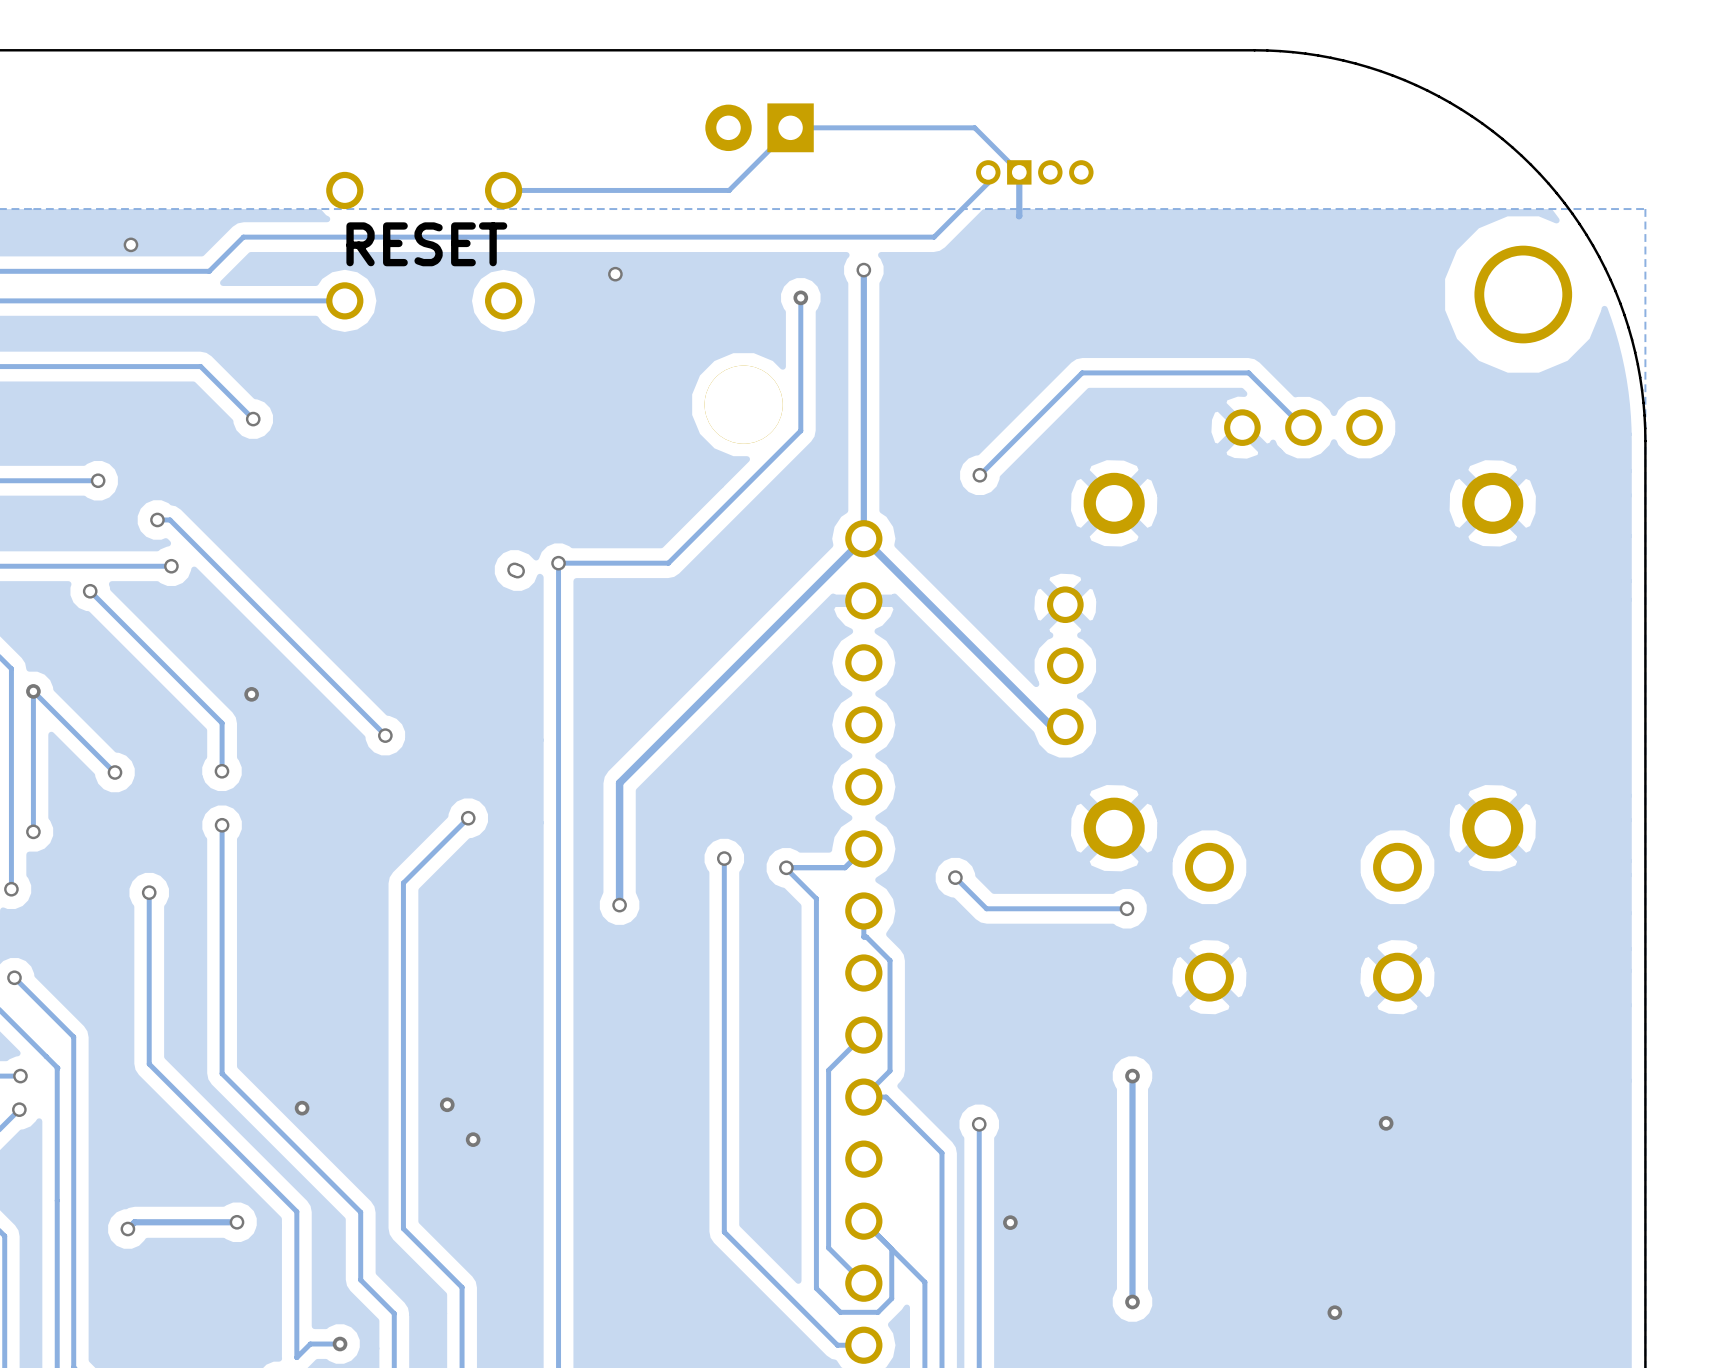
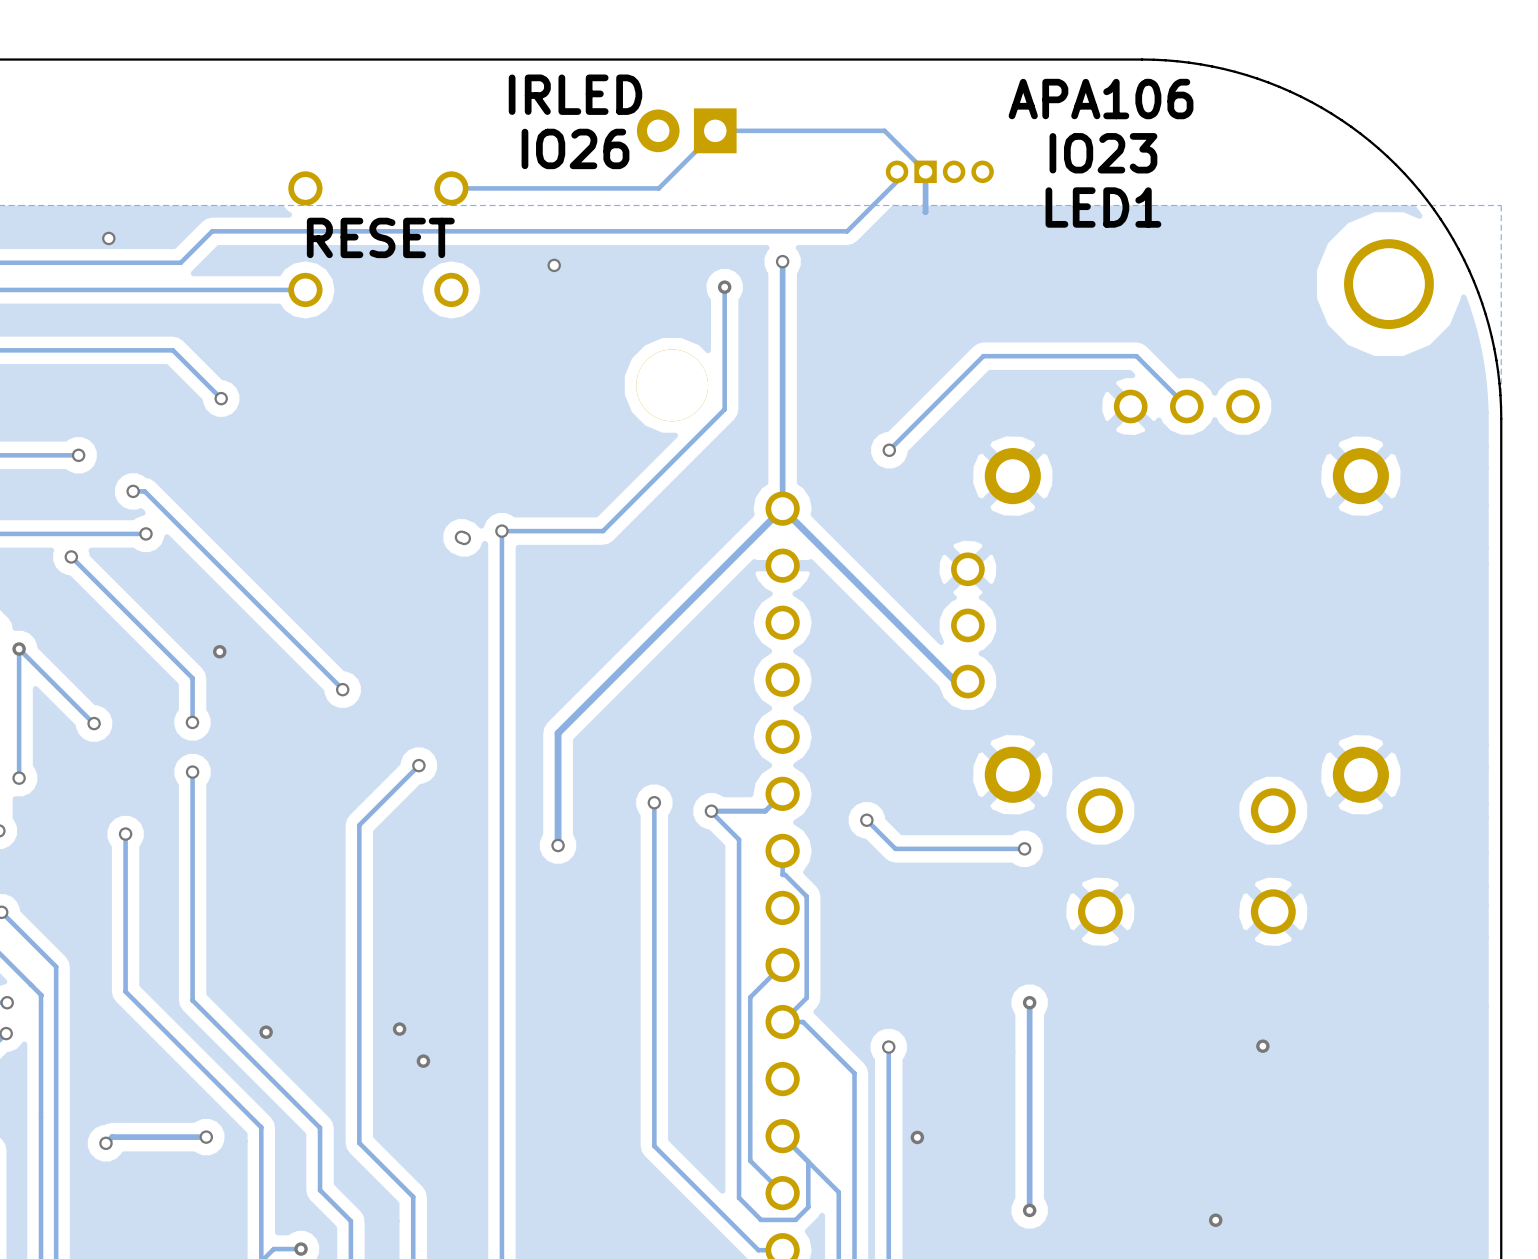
text: none -> IRLED (575, 94)
text: none -> APA106 (1101, 99)
text: none -> IO26 (575, 148)
text: none -> IO23 (1103, 153)
text: none -> LED1 (1103, 207)

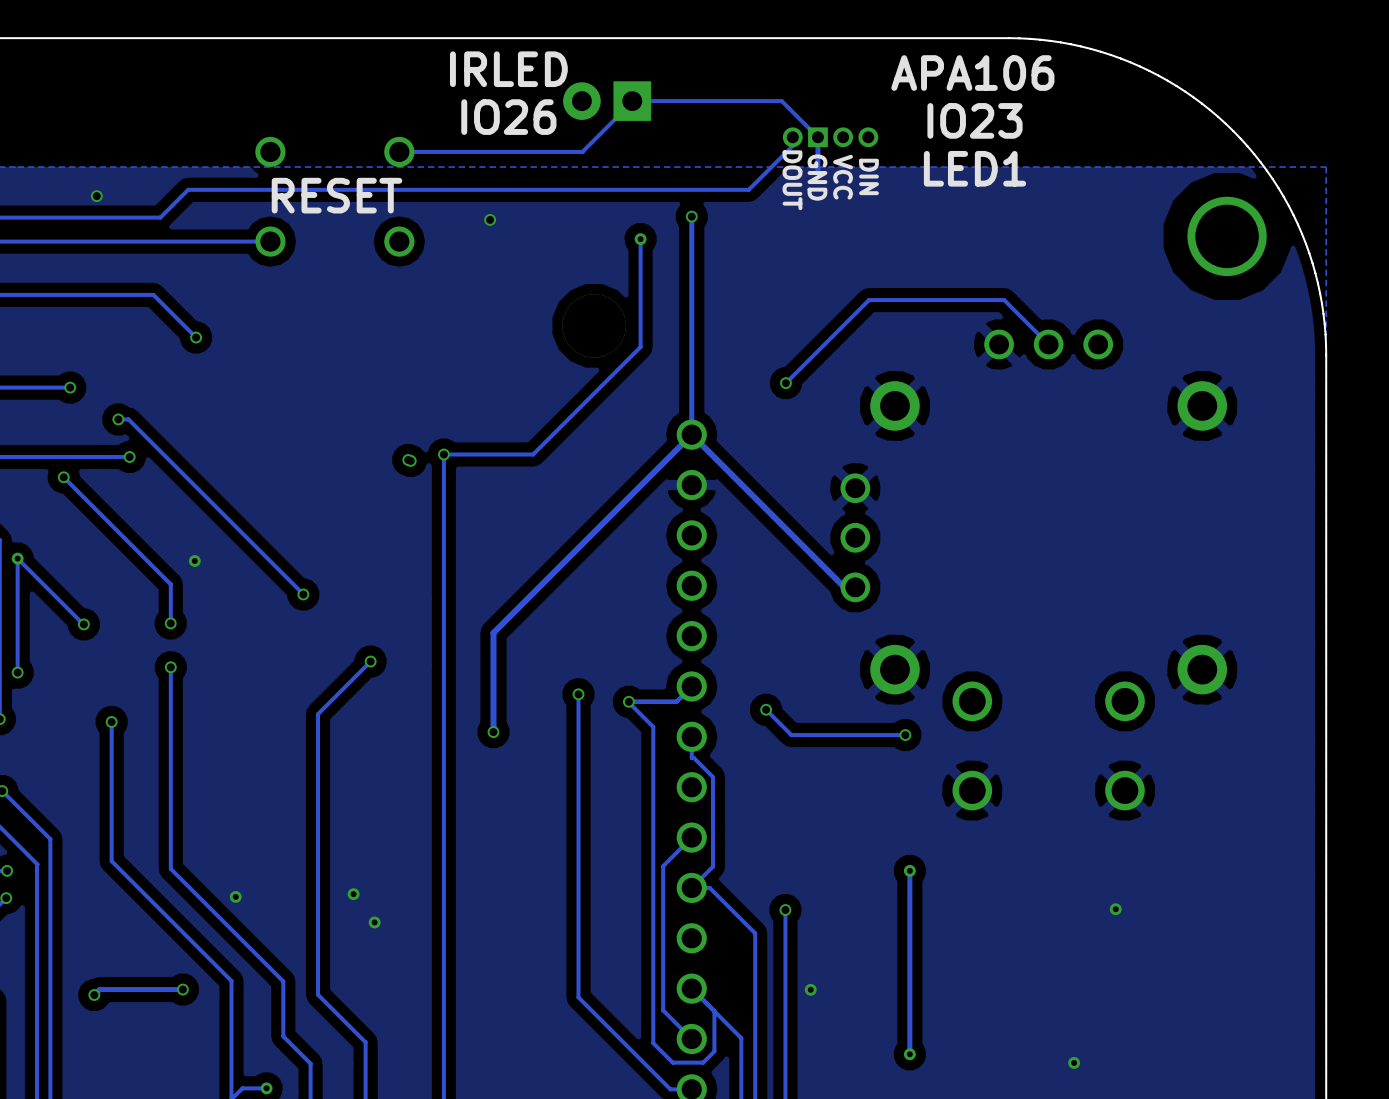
text: none -> VCC (843, 177)
text: none -> DIN (869, 176)
text: none -> GND (817, 177)
text: none -> DOUT (792, 180)

